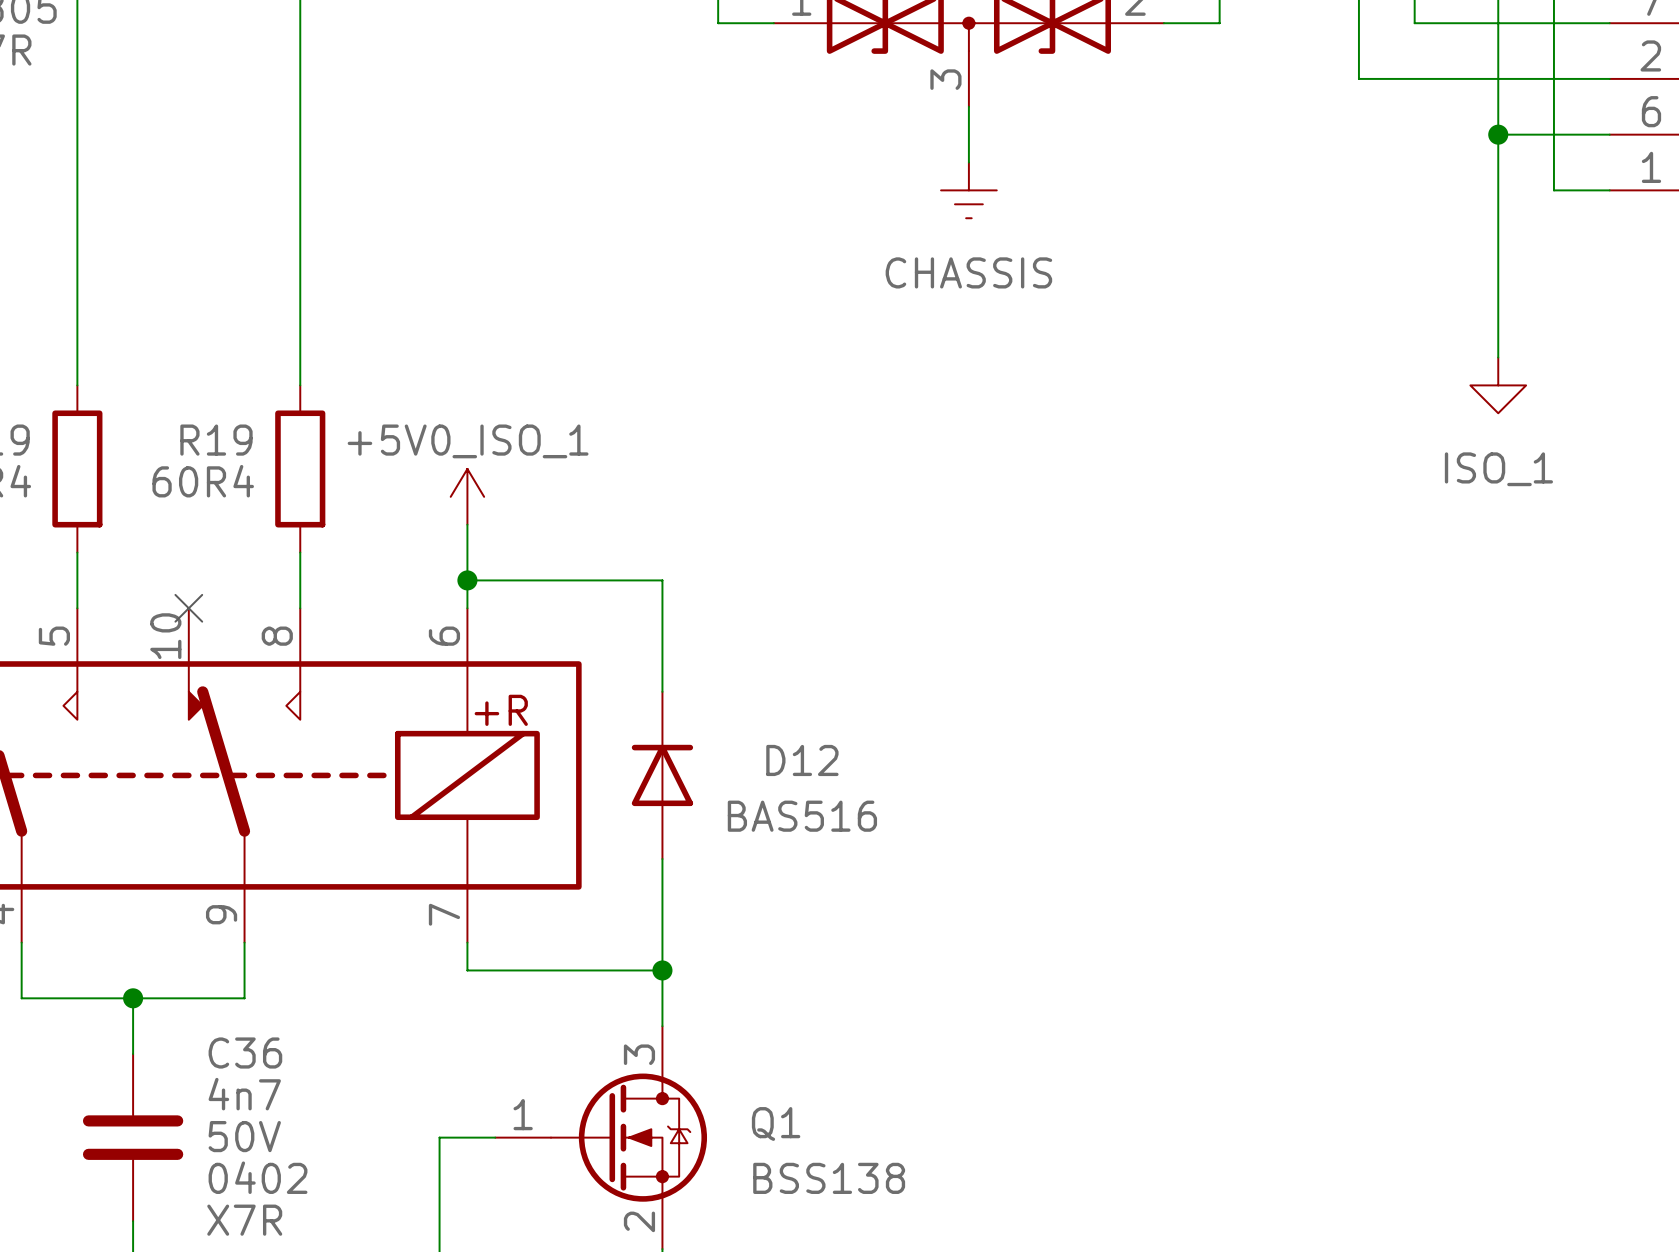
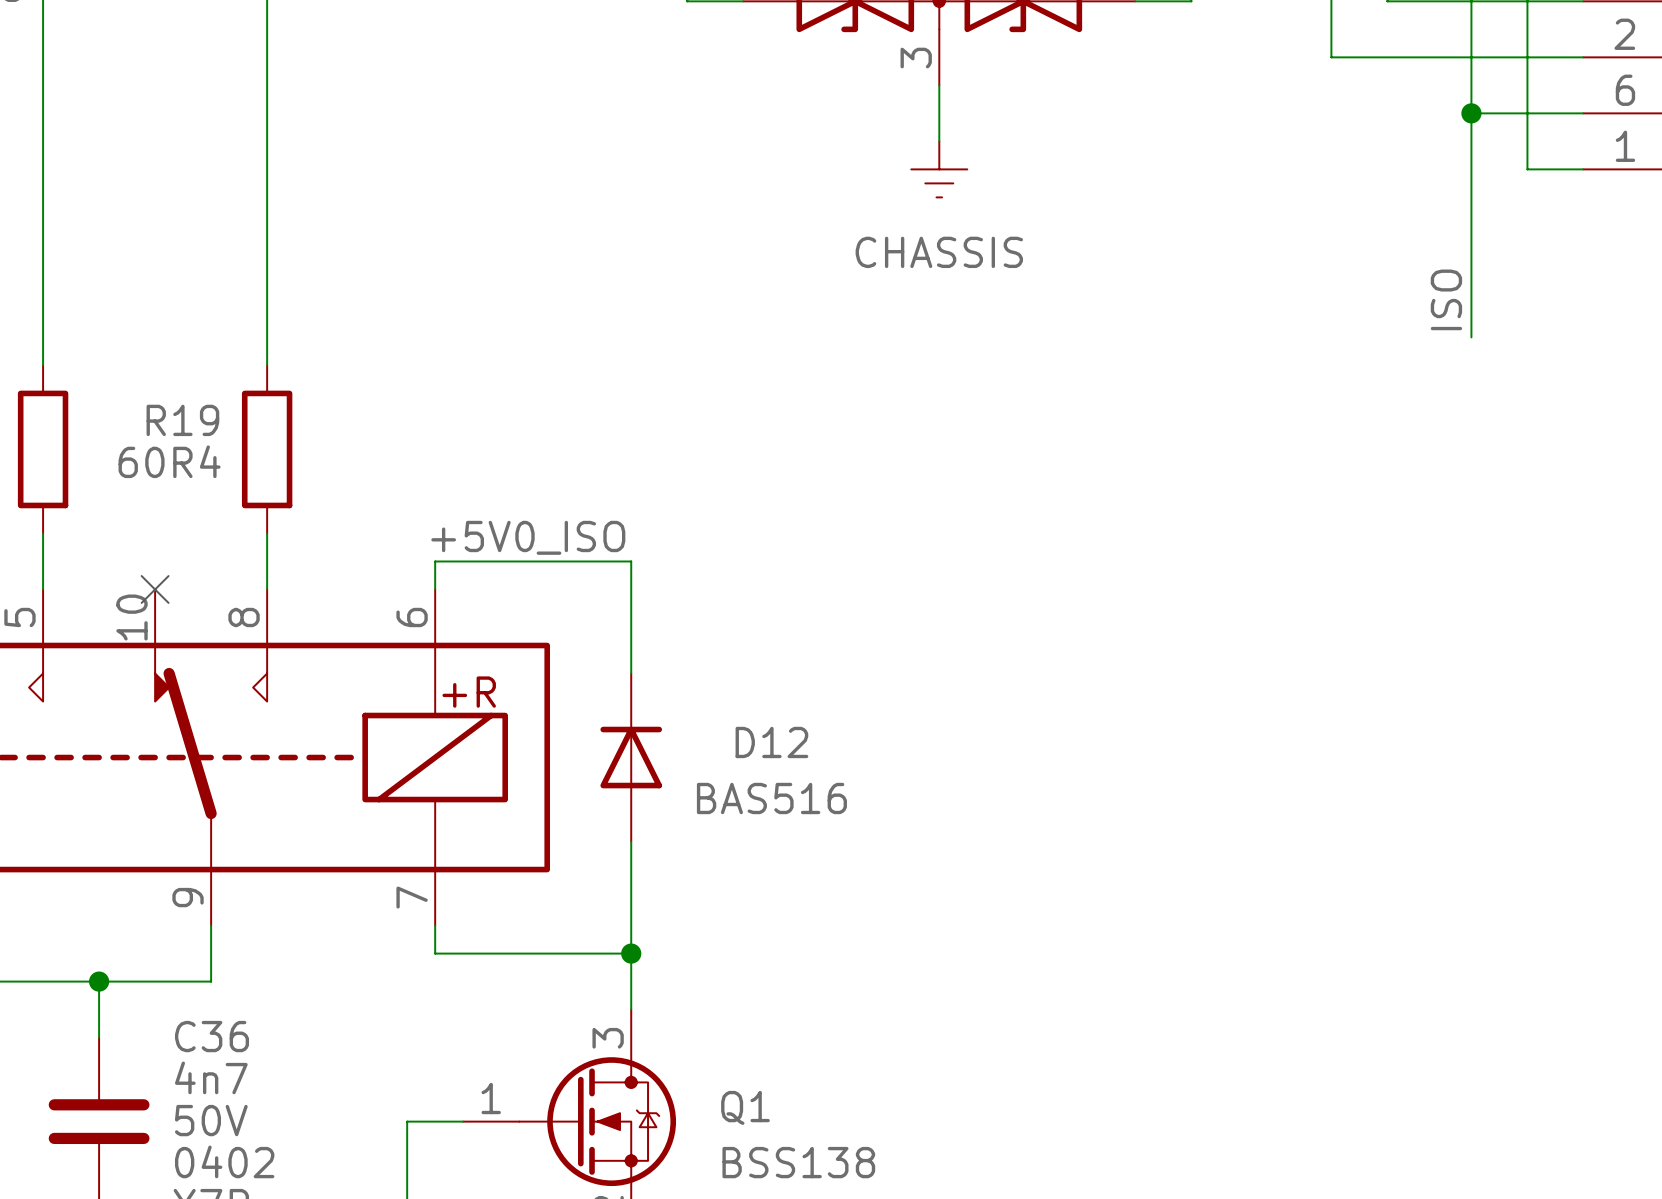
label: none -> ISO (1446, 299)
power symbol: ISO_1 (1498, 385) -> none
power symbol: +5V0_ISO_1 (467, 496) -> none
wire: (467, 524) (467, 580) -> none
label: none -> +5V0_ISO (528, 537)
junction: (467, 580) -> none

